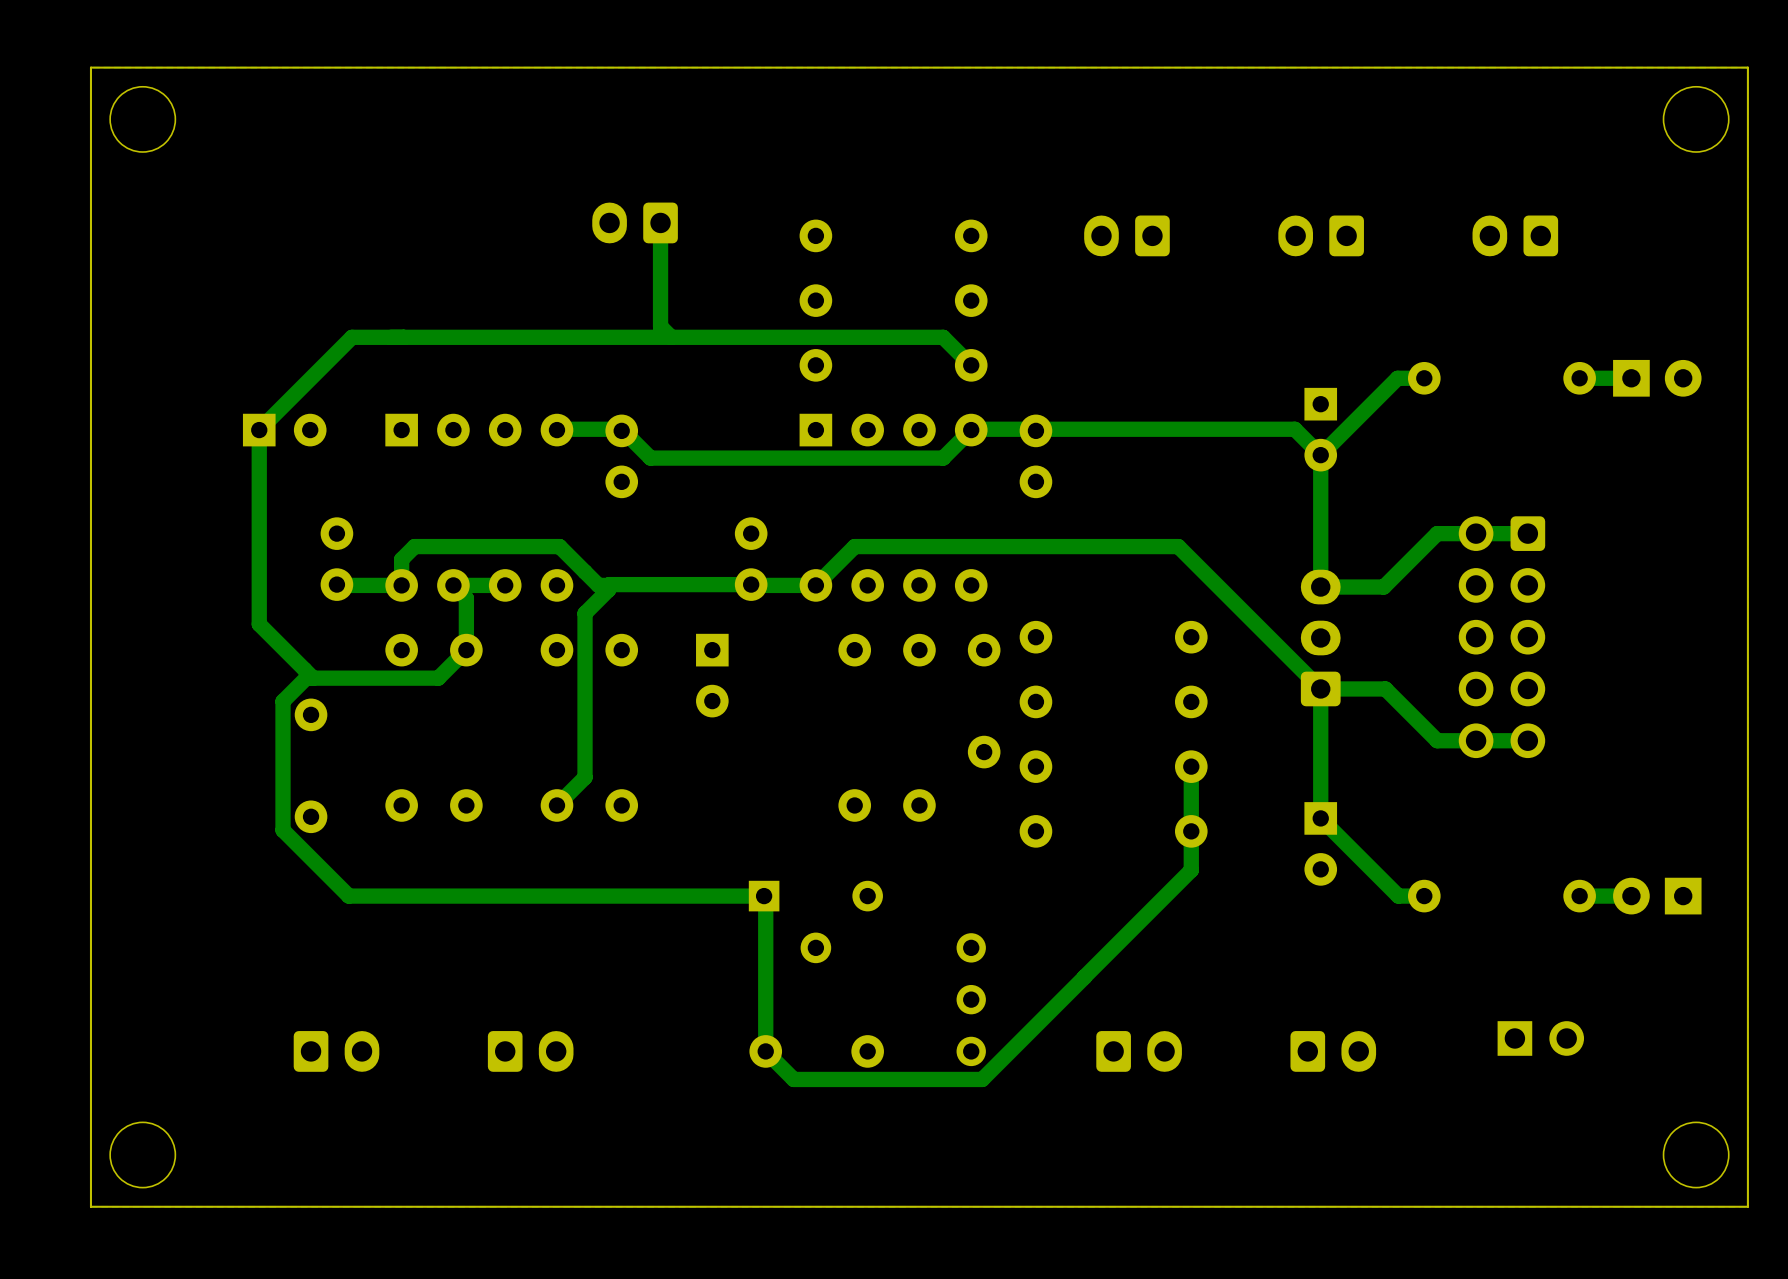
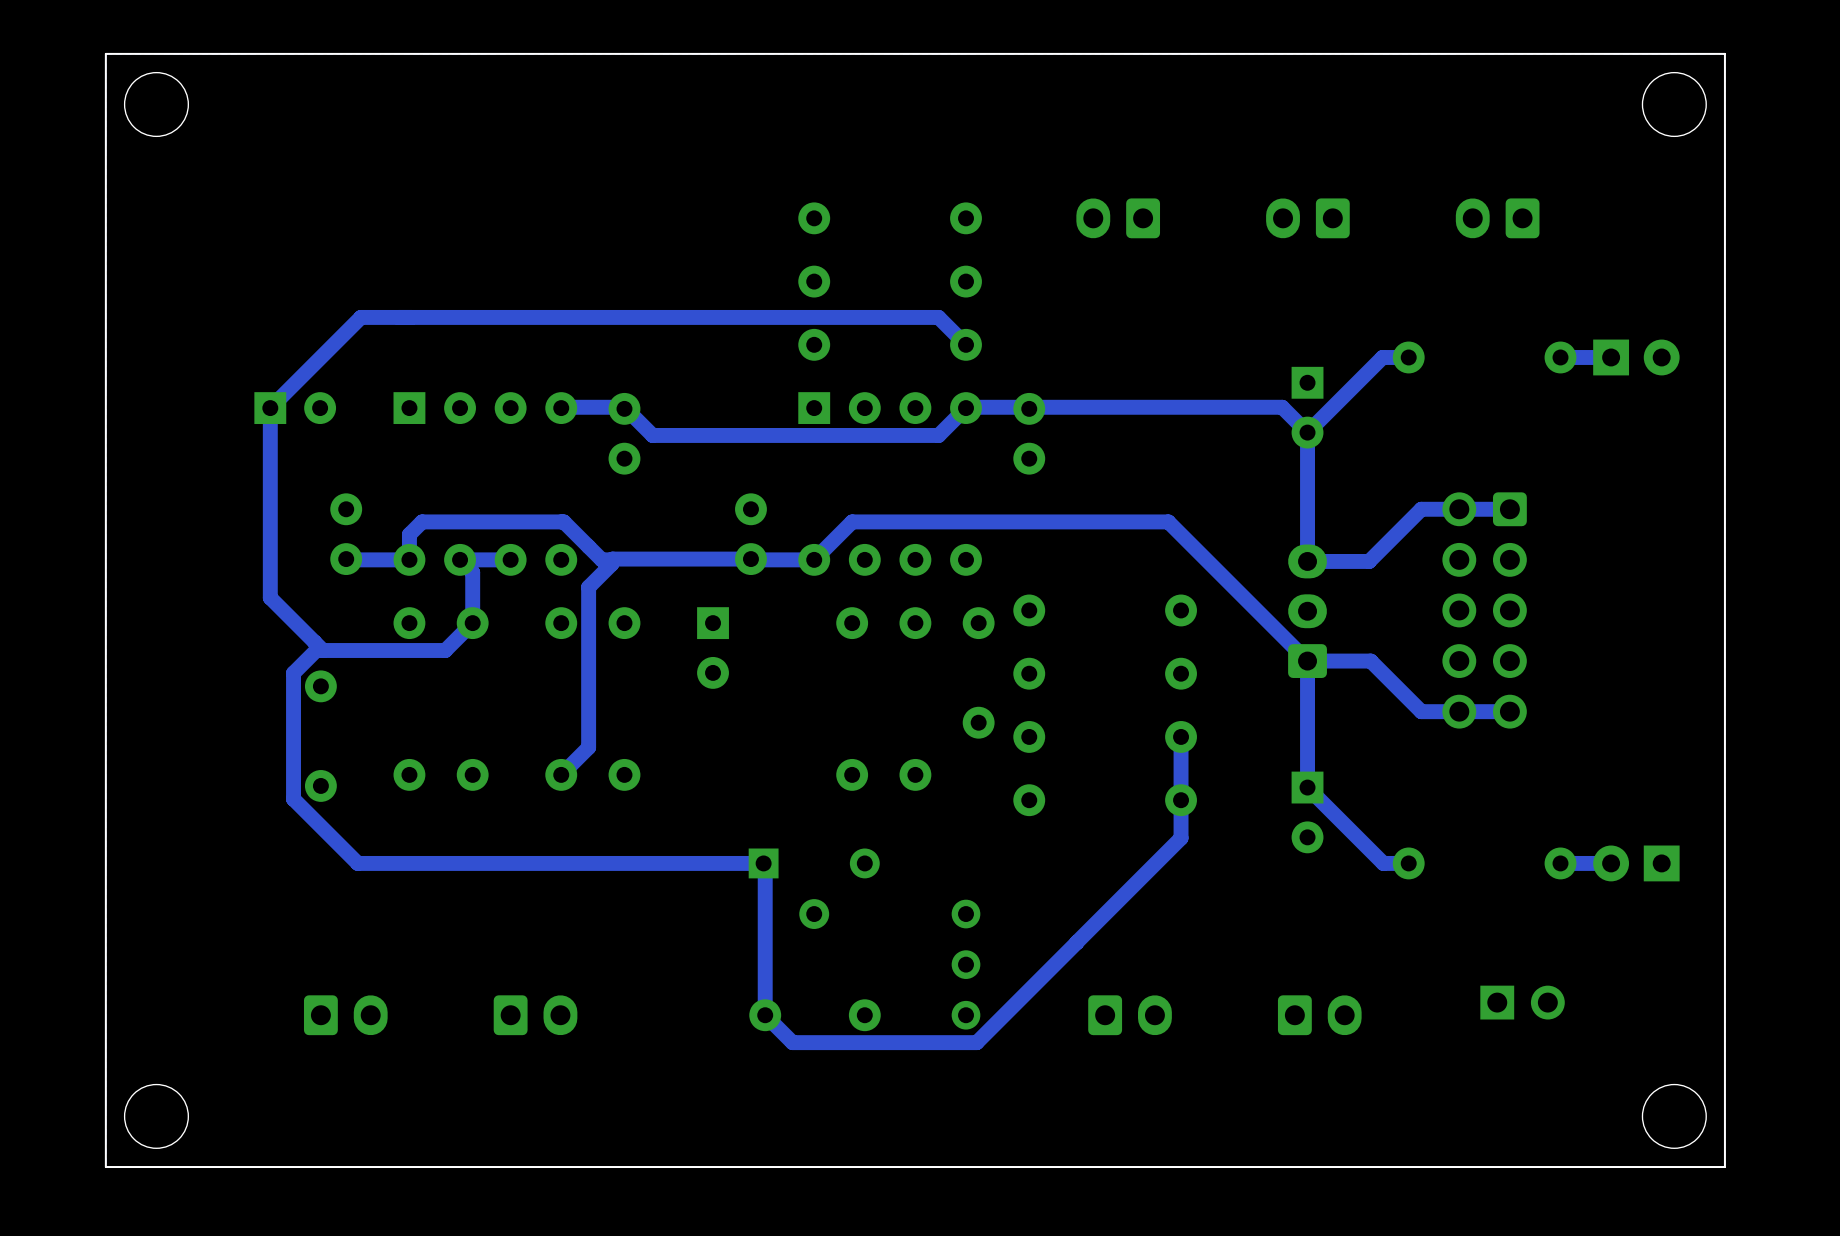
part: (635, 222) -> none
track: (660, 222) (660, 326) (671, 337) -> none

